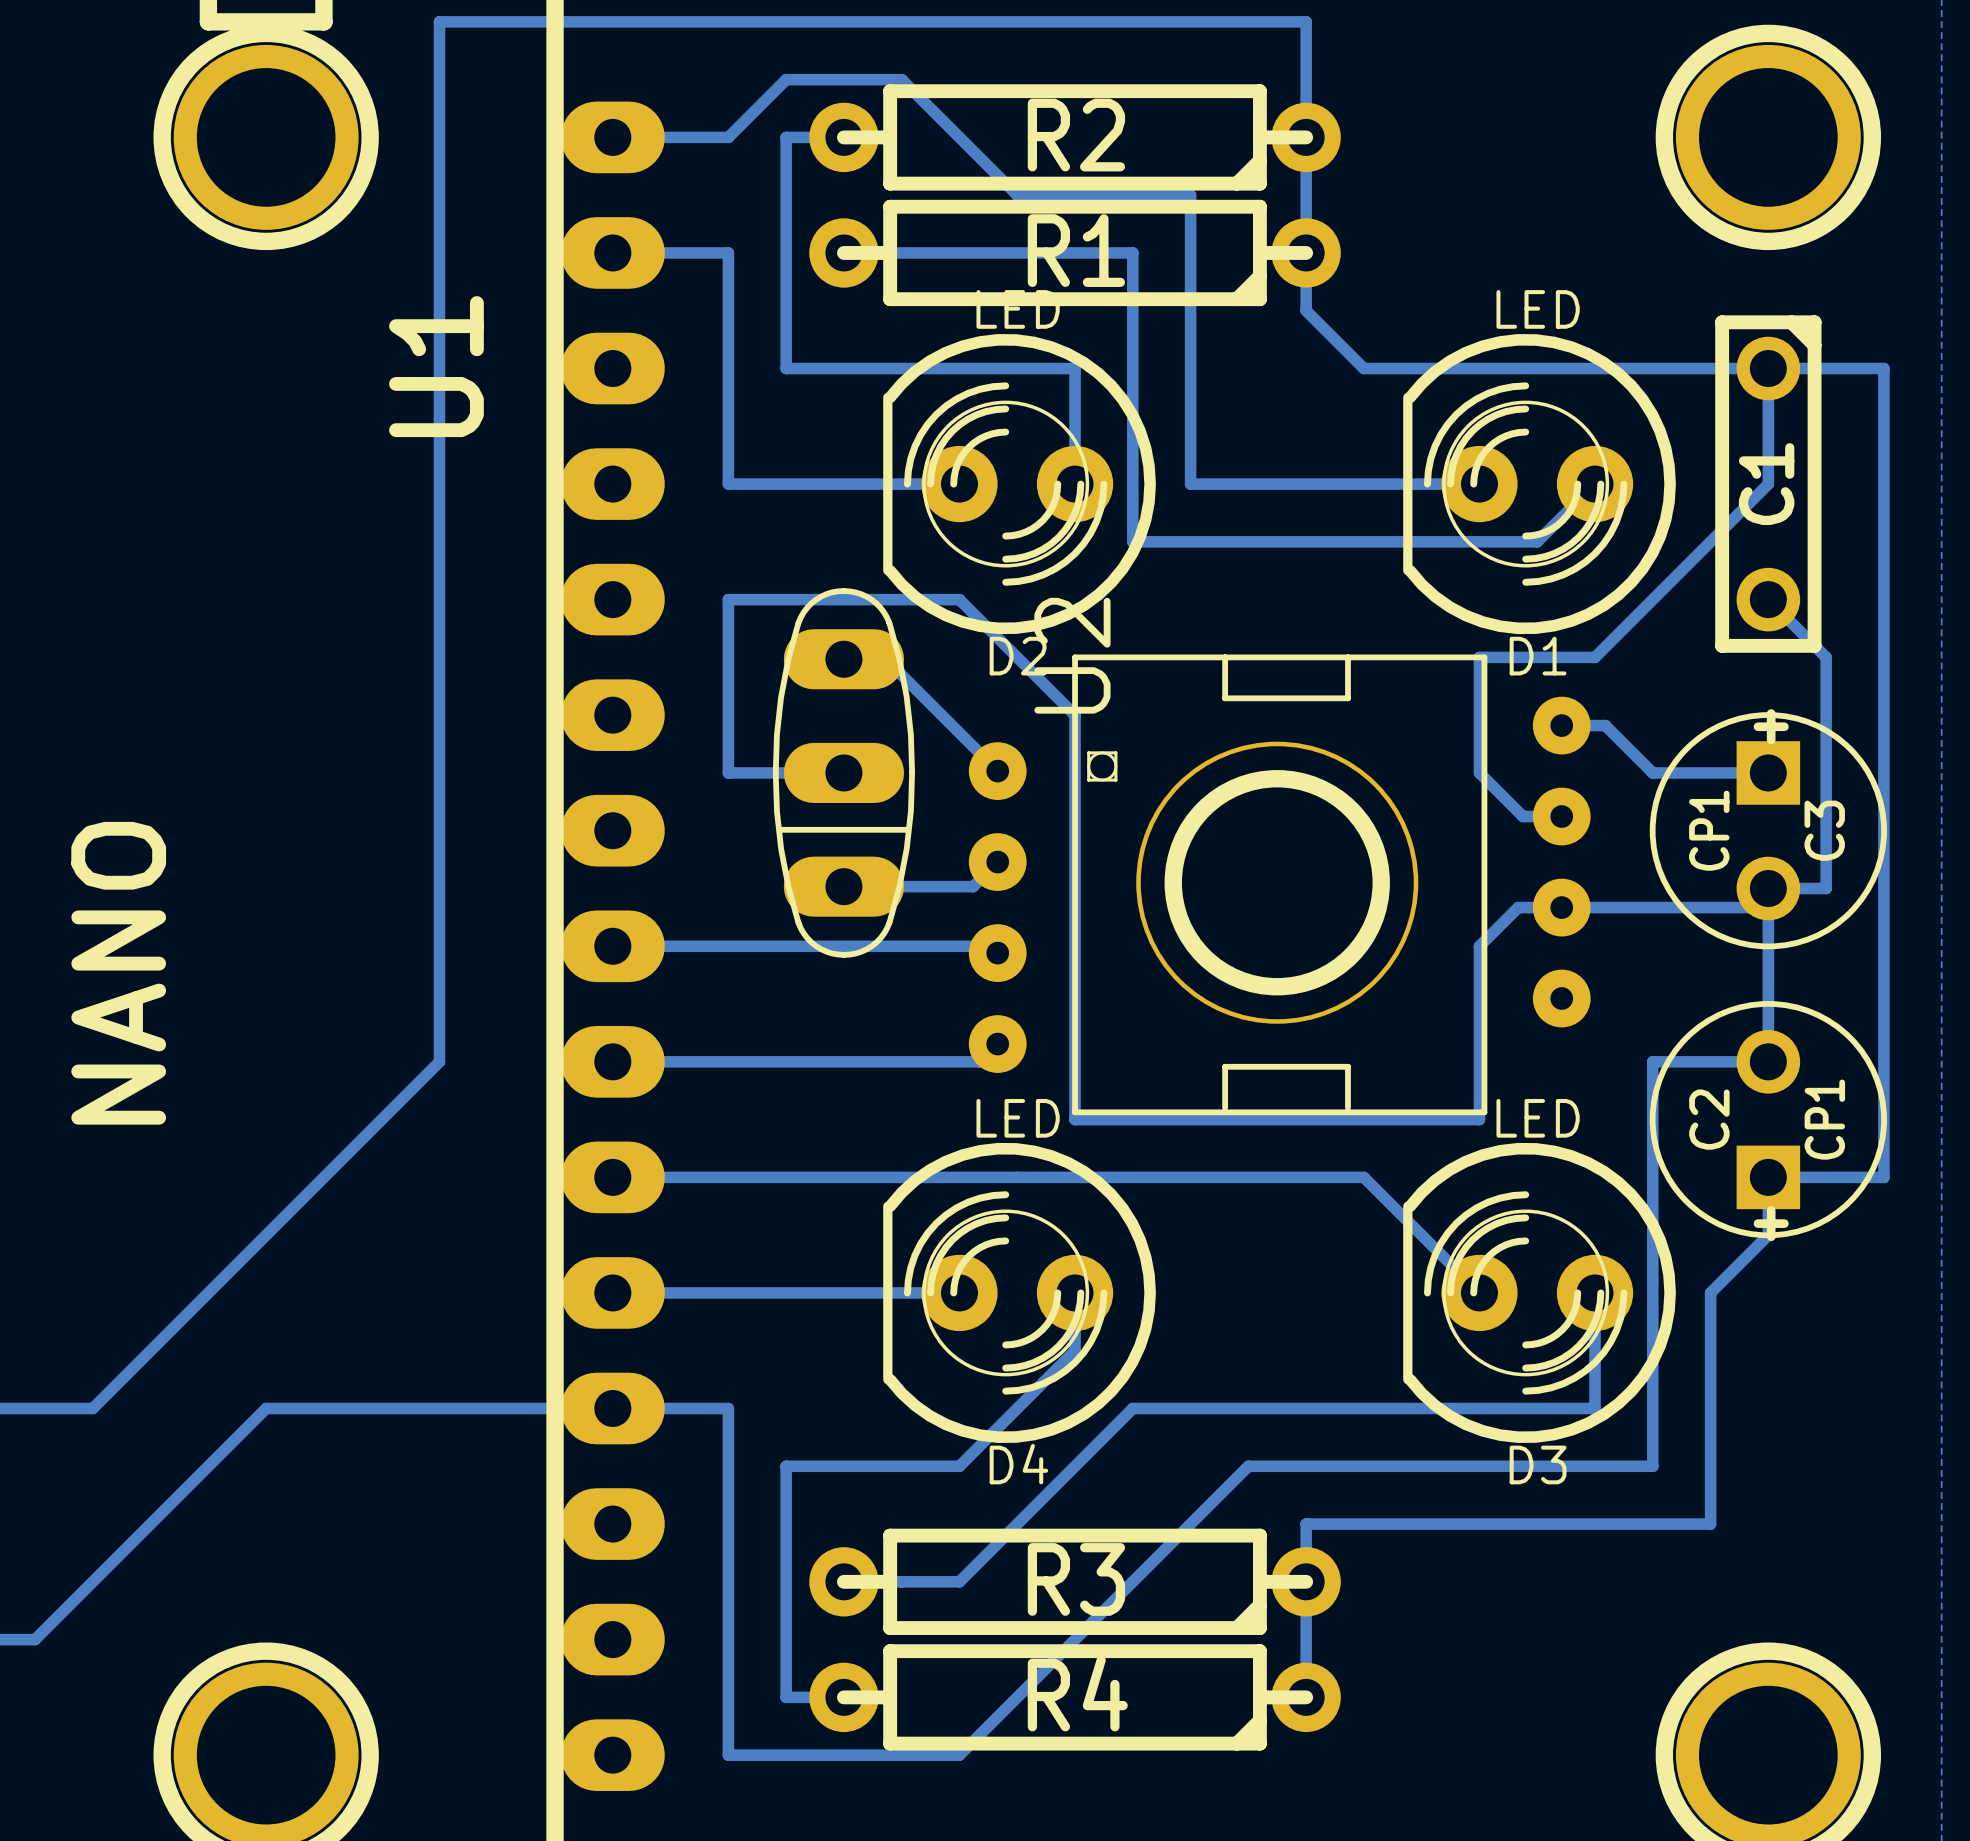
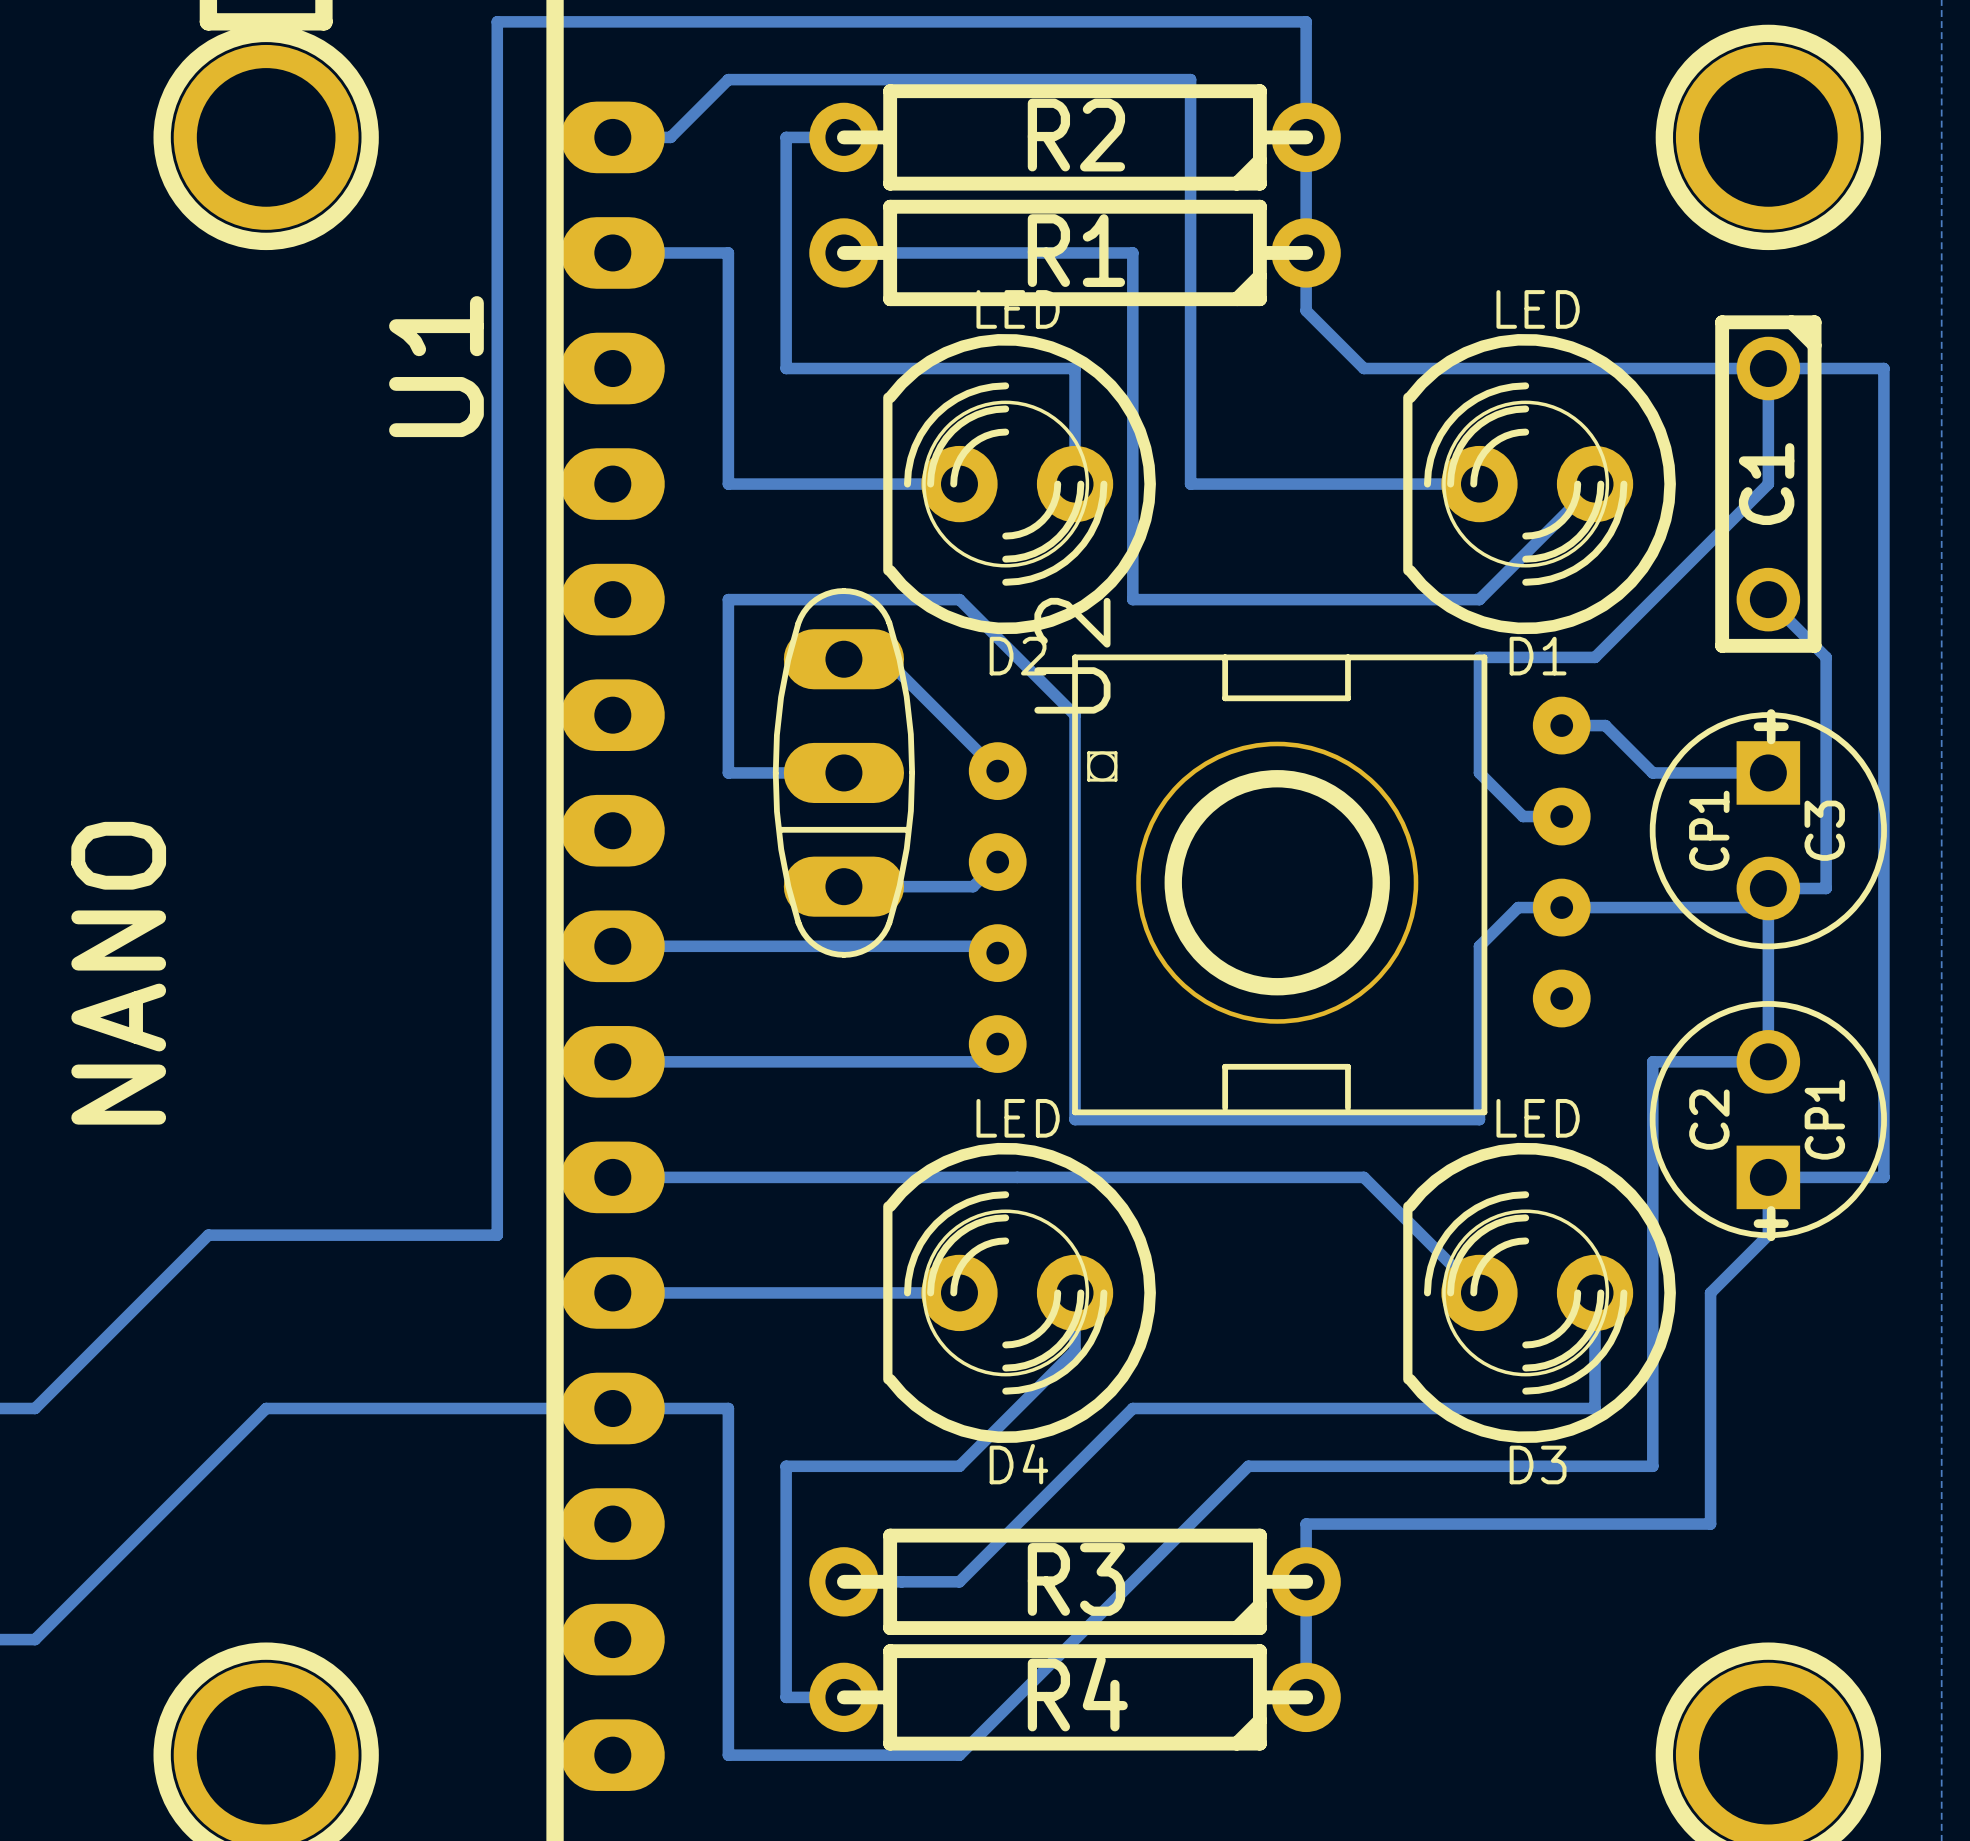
bottom track: (497, 21) (439, 21) (439, 1061) (92, 1408) (35, 1408) -> (497, 21) (497, 1235) (208, 1235) (35, 1408)
bottom track: (786, 79) (728, 137) (670, 137) -> (786, 79) (728, 79) (670, 137)
bottom track: (901, 79) (1017, 195) (1190, 195) -> (901, 79) (1190, 79) (1190, 195)
bottom track: (1132, 541) (1537, 541) -> (1132, 541) (1132, 599) (1479, 599) (1537, 541)

